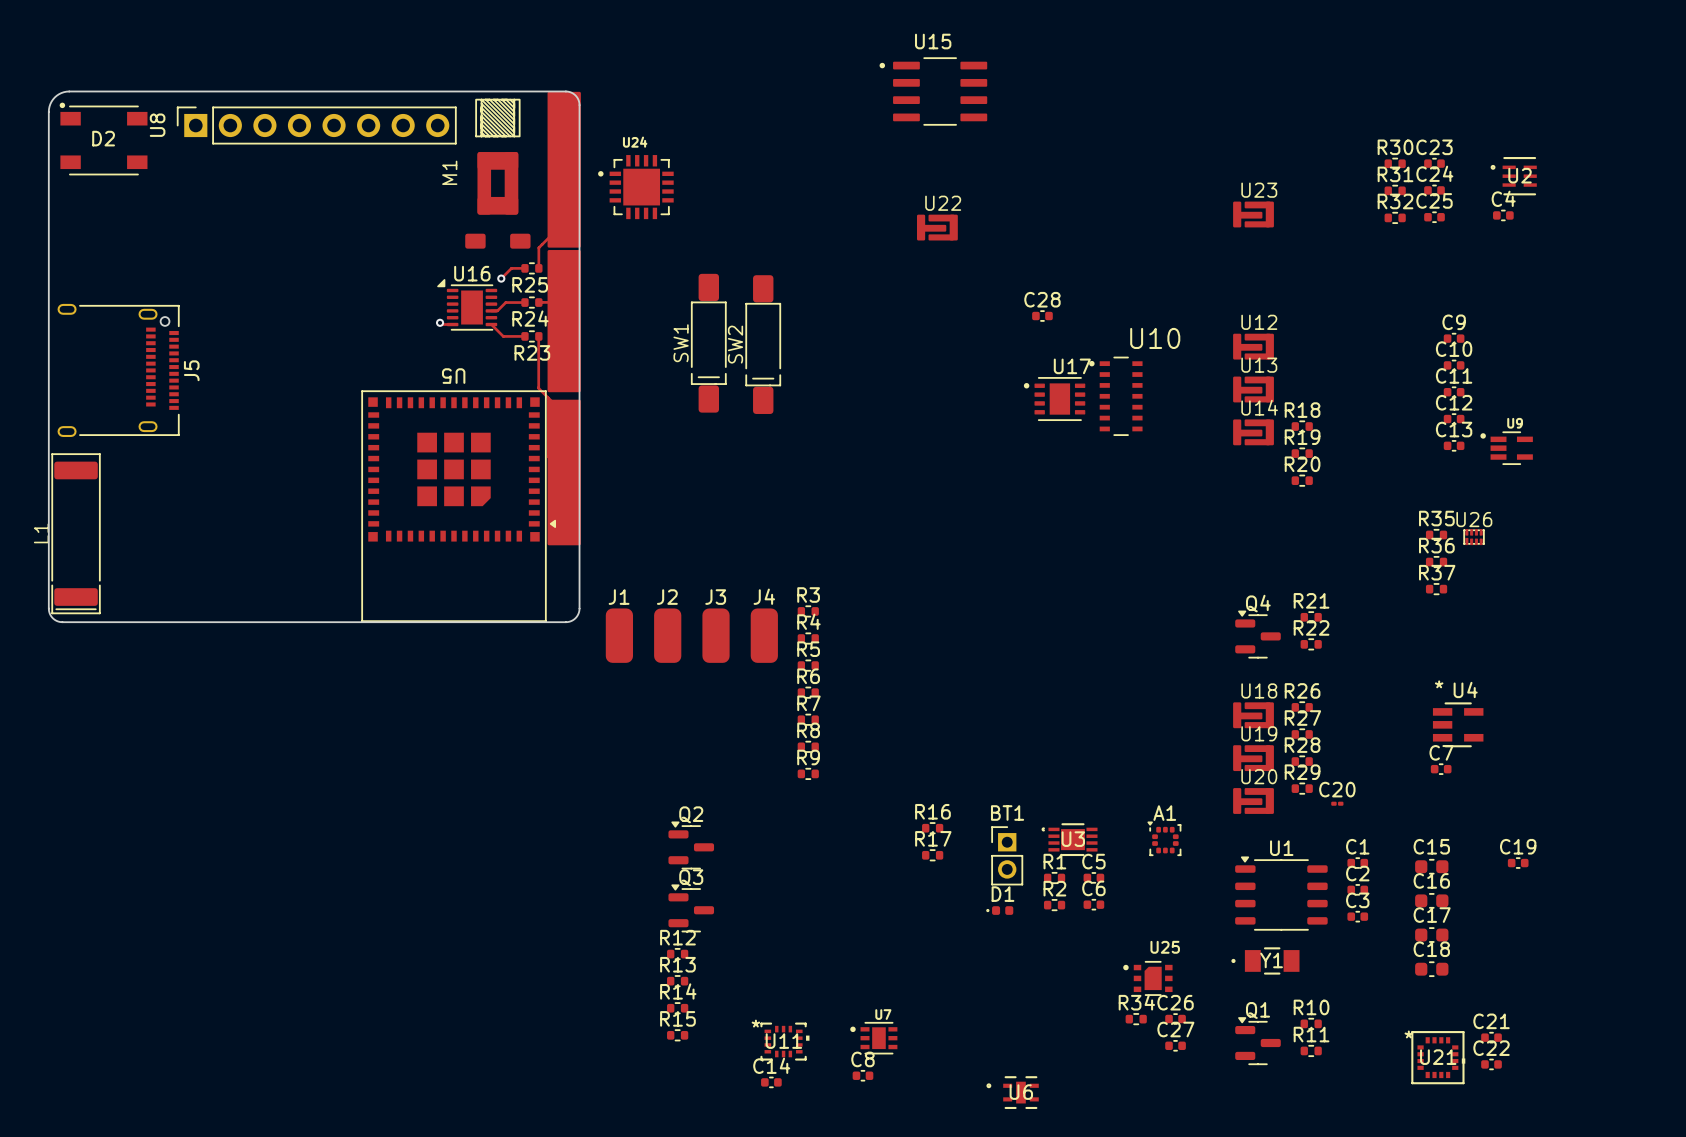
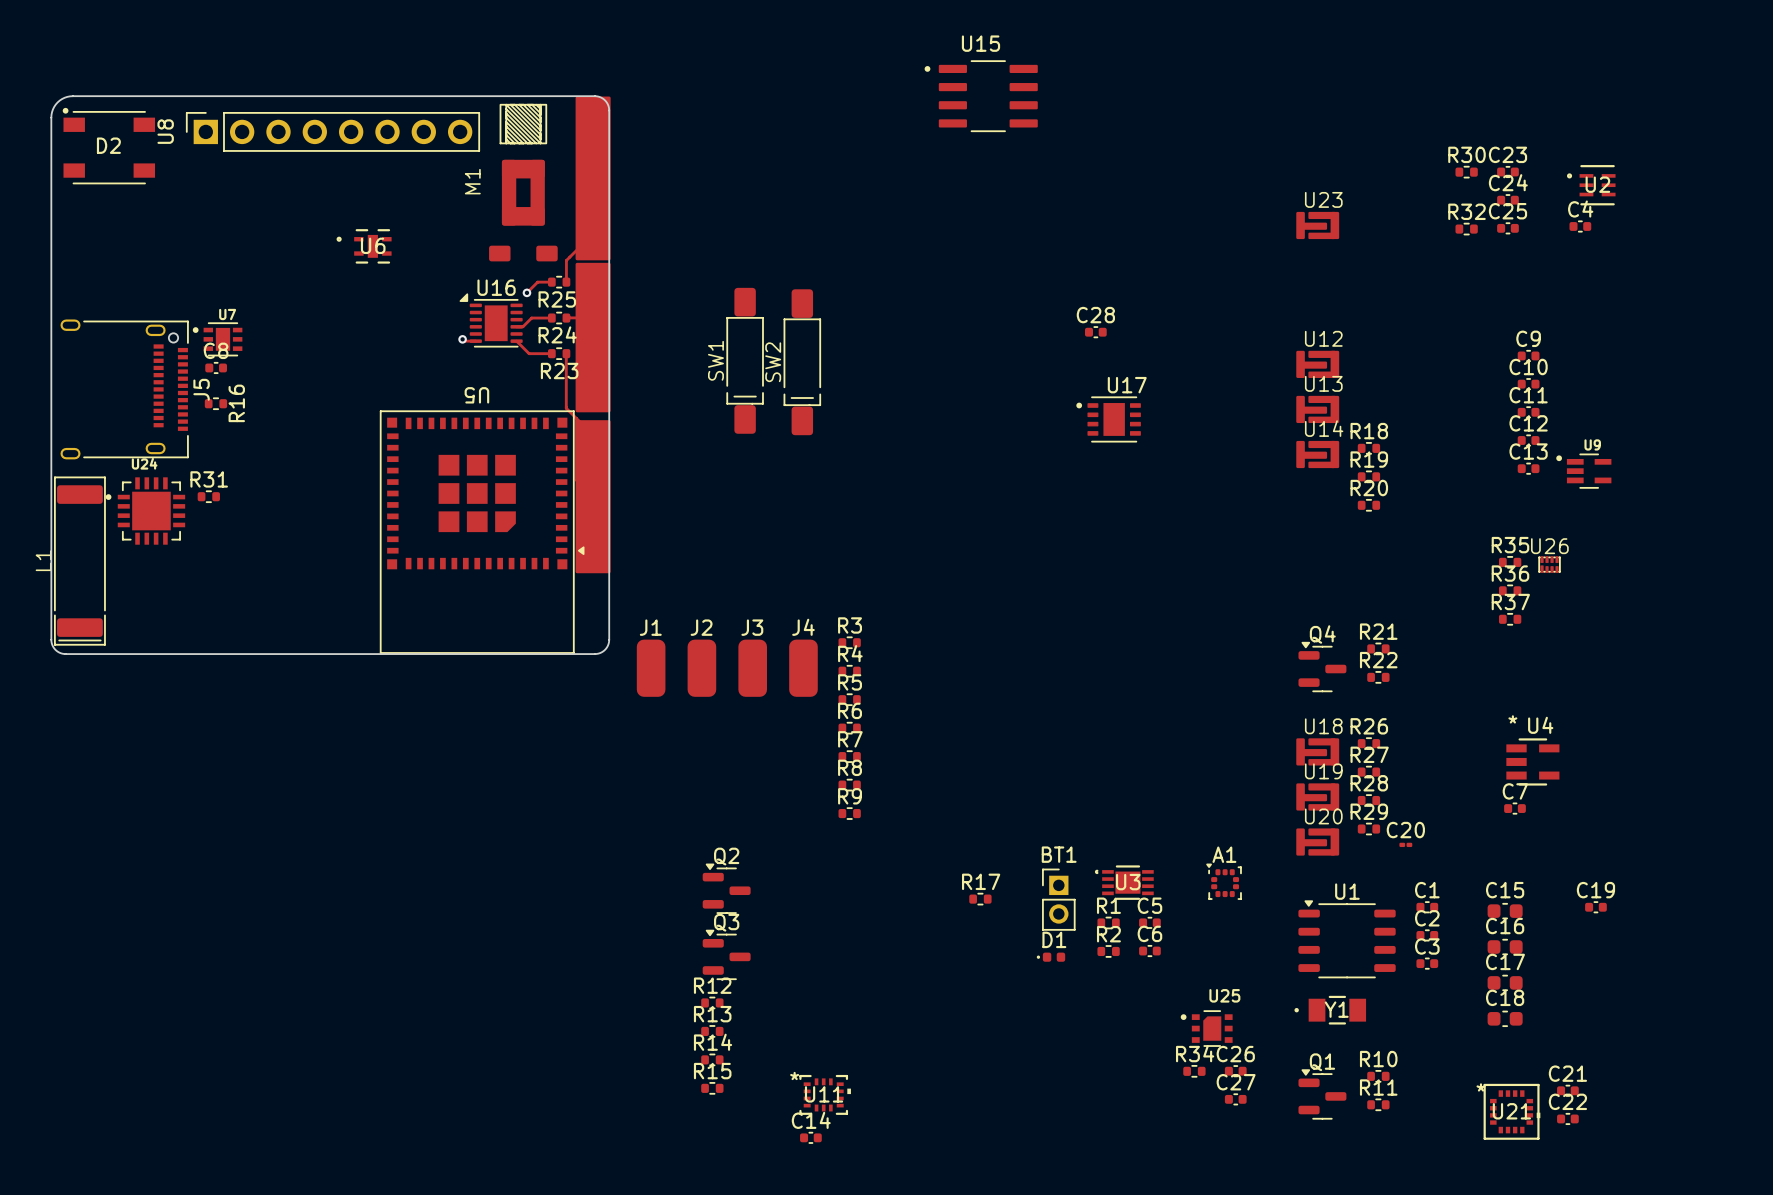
U24 position: (635, 187) -> (145, 511)
R31 position: (1395, 190) -> (208, 496)
U22: (937, 227) -> none
U10: (1115, 396) -> none
R16 name rotation: 0° (932, 811) -> 90° counterclockwise (236, 403)
R16 position: (932, 828) -> (215, 403)
U7 position: (873, 1038) -> (217, 339)
C8 position: (862, 1075) -> (216, 367)
U6 position: (1012, 1092) -> (364, 246)

